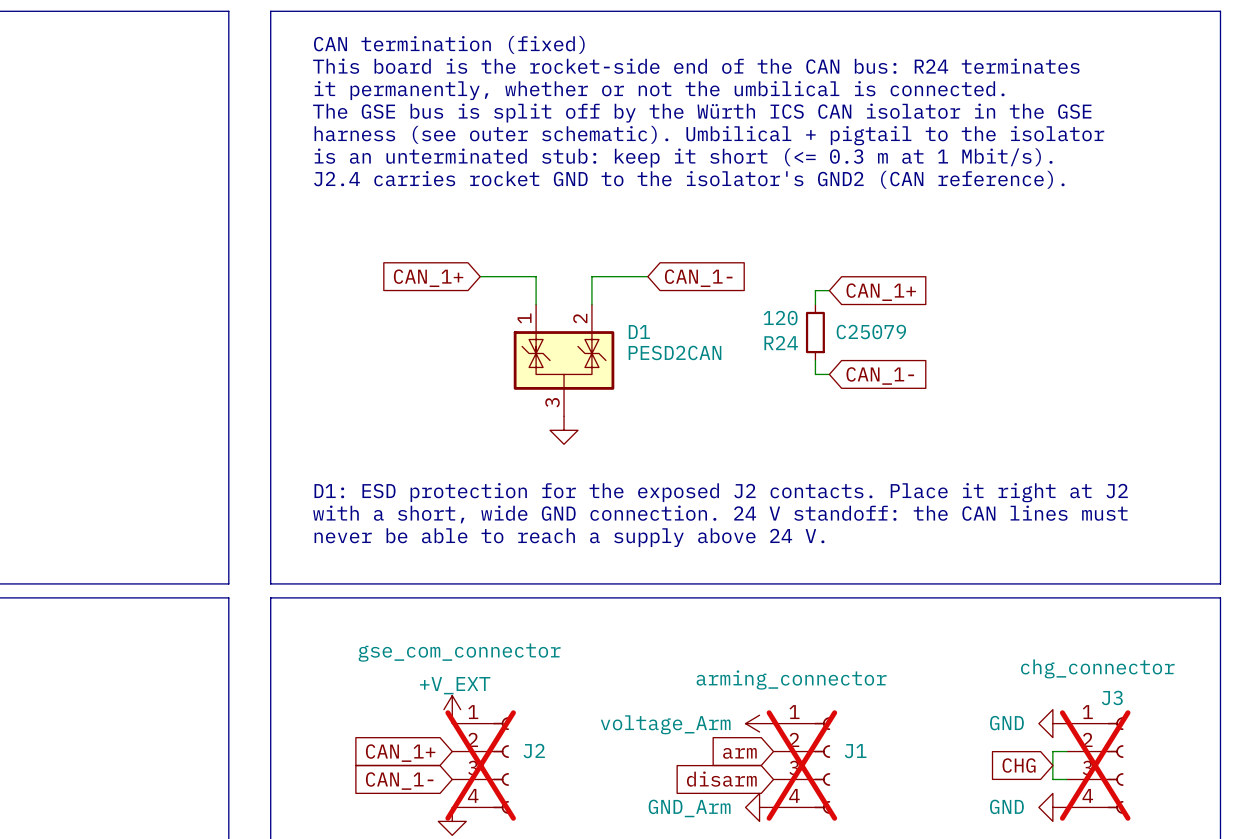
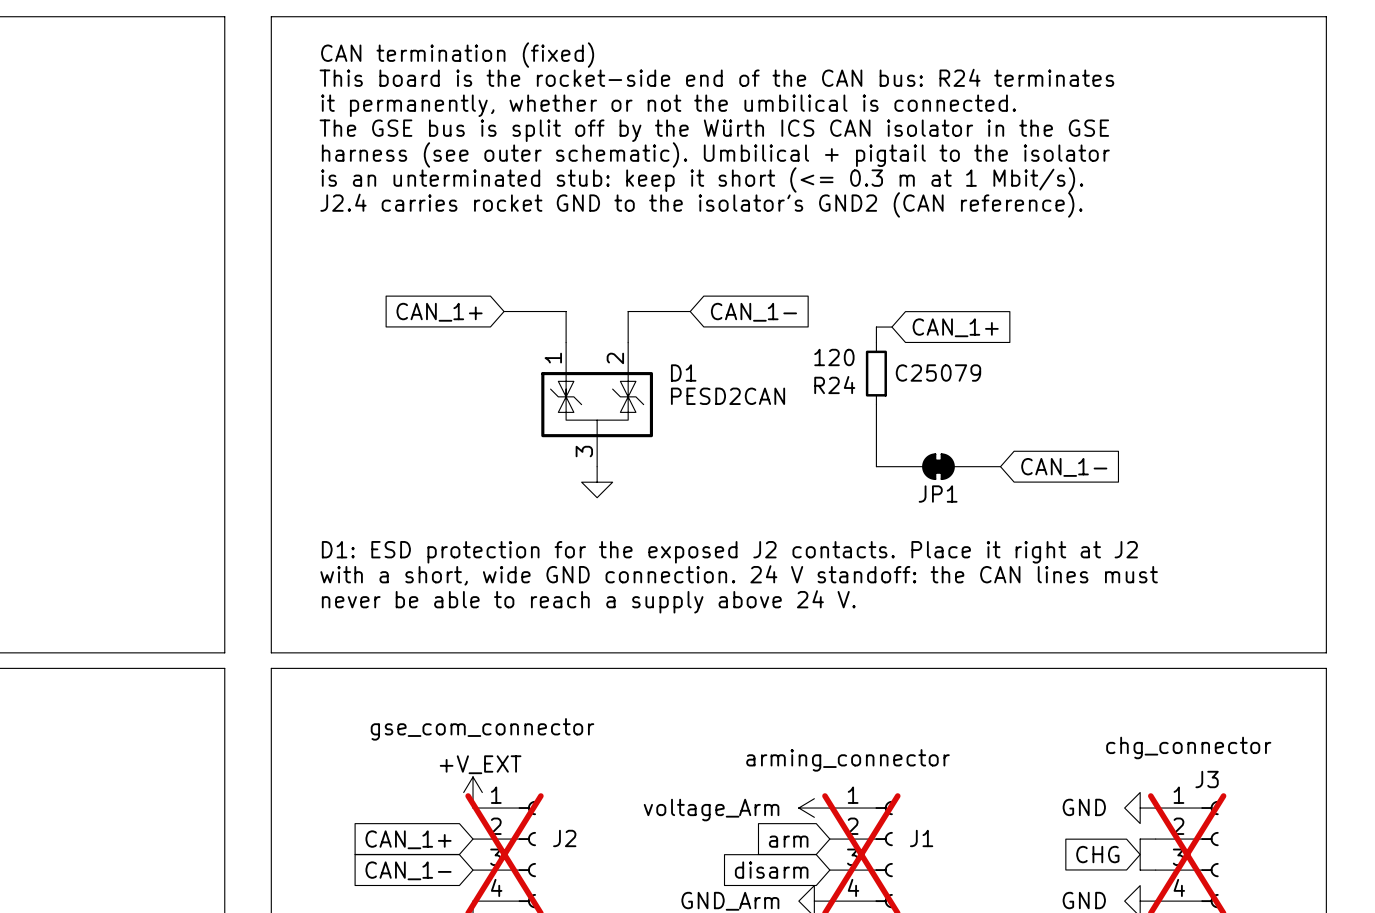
wire: (815, 374) (829, 374) -> (876, 420) (876, 466)
global label position: CAN_1- (880, 376) -> CAN_1- (1064, 467)
JP1: none -> (938, 466)

